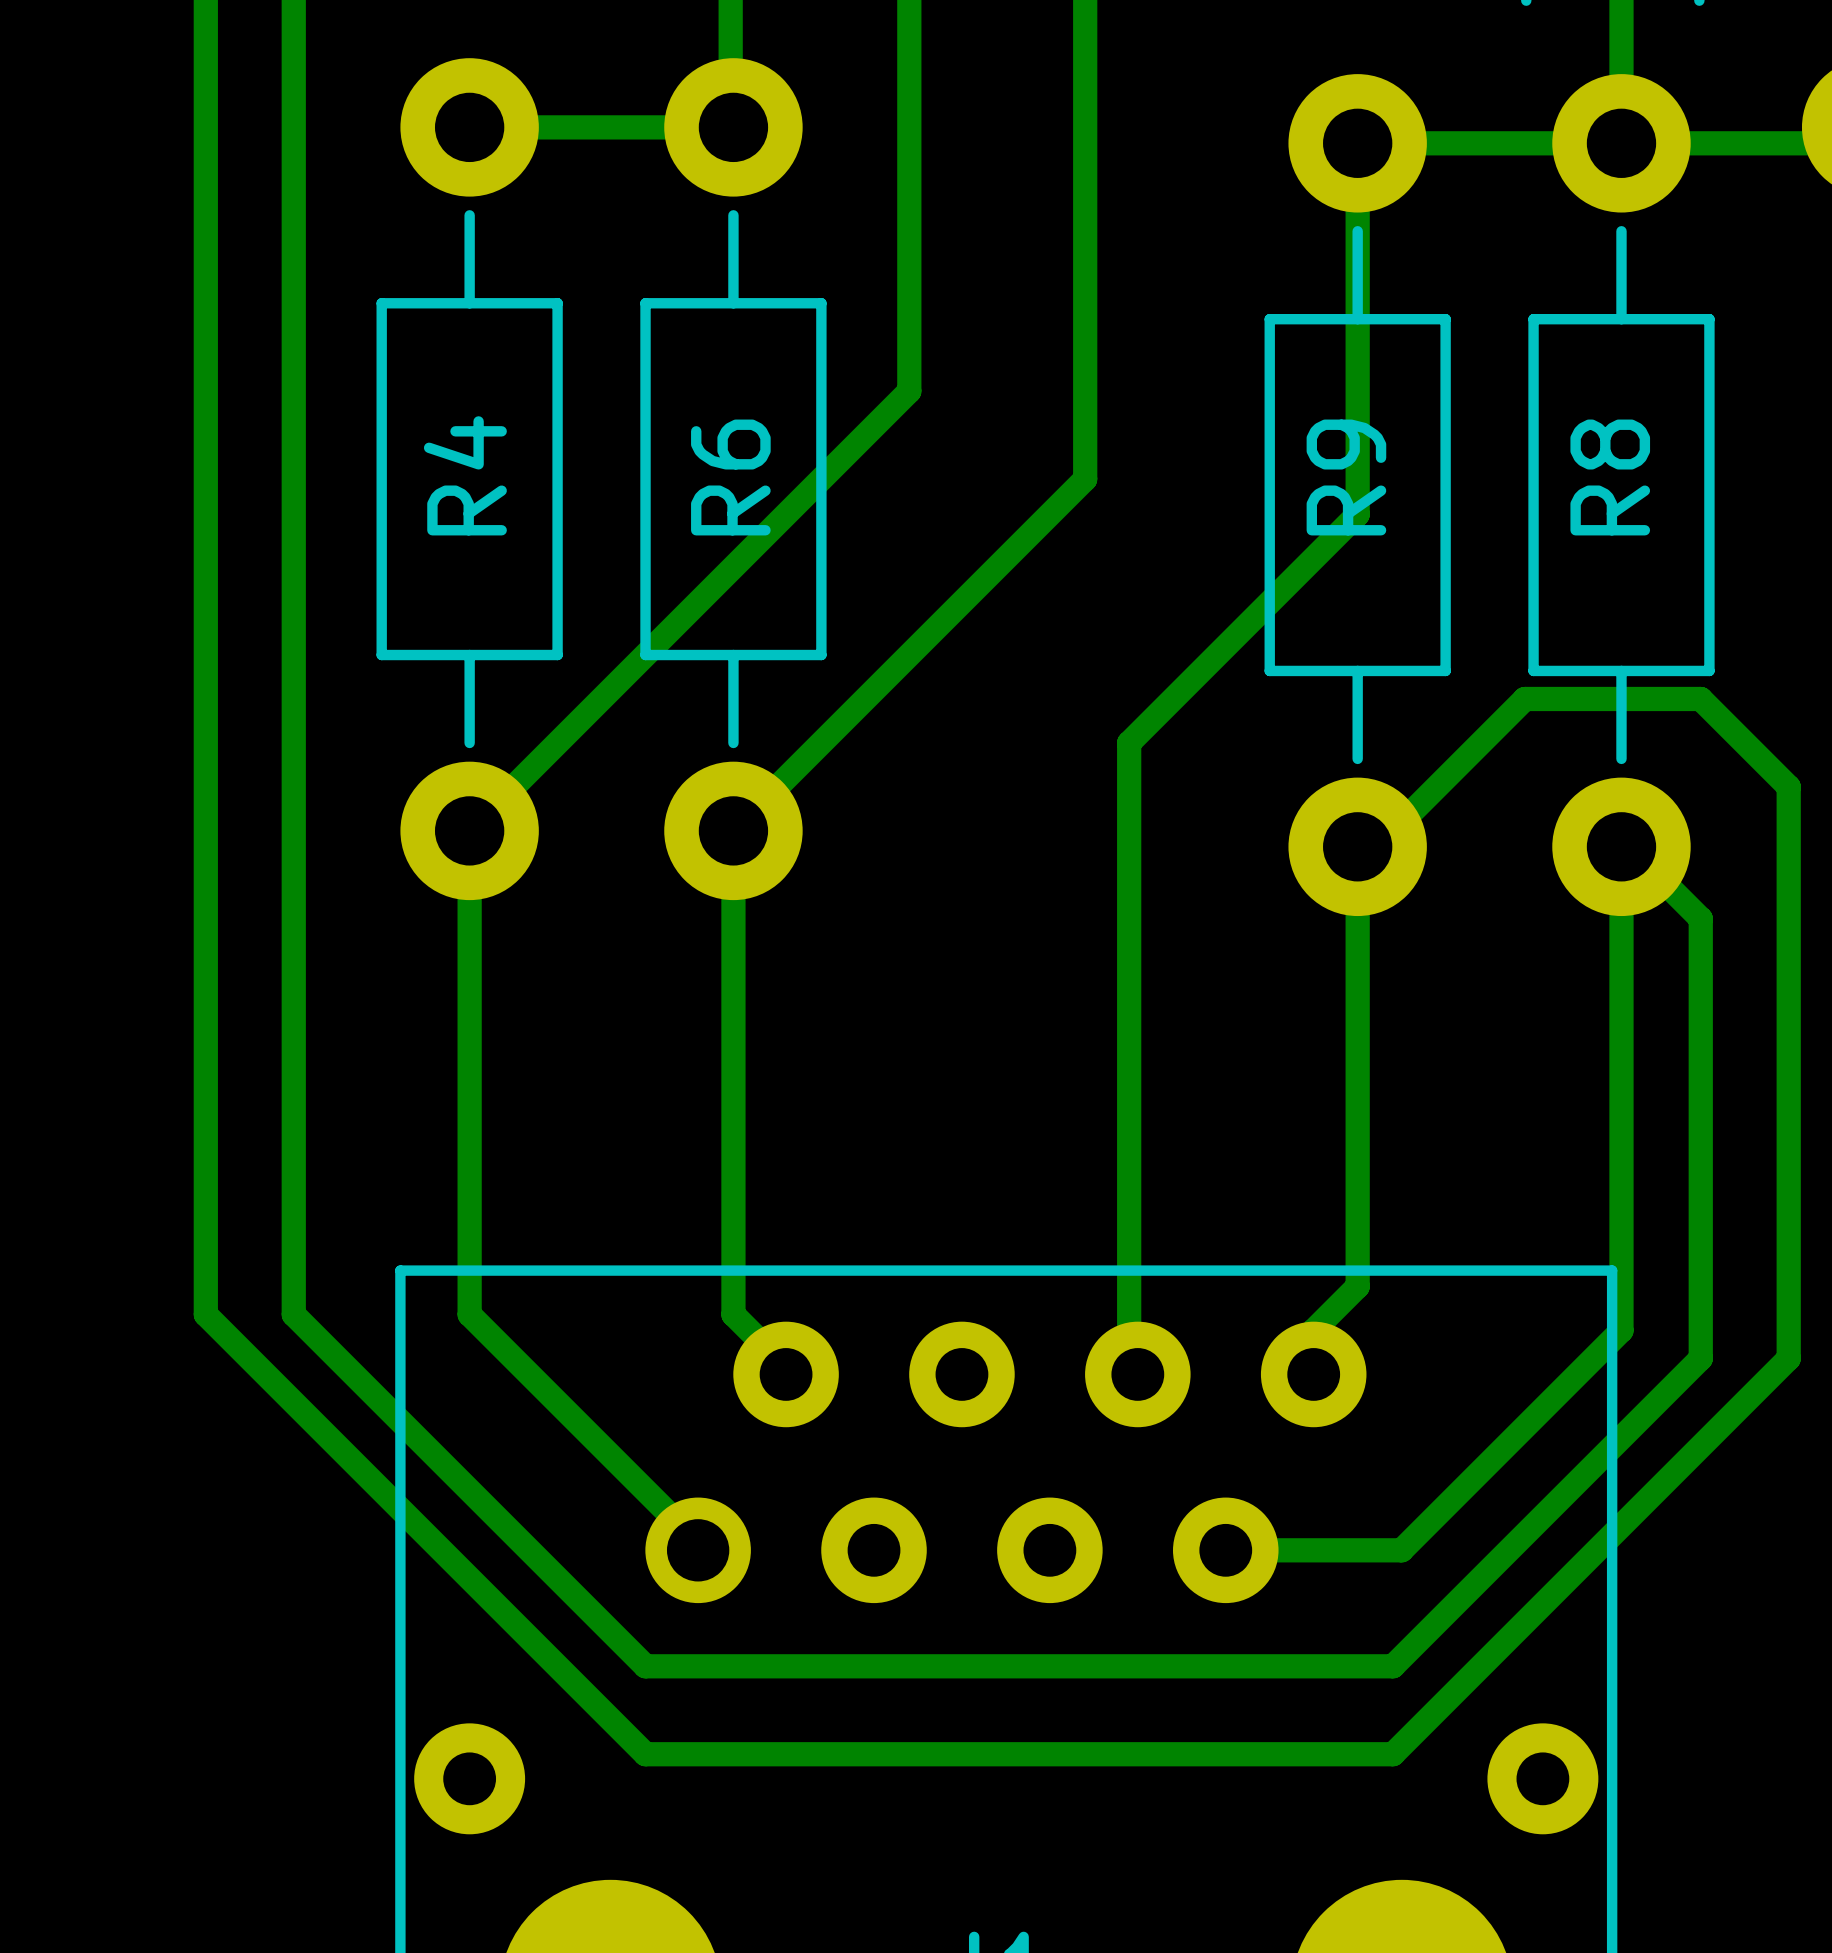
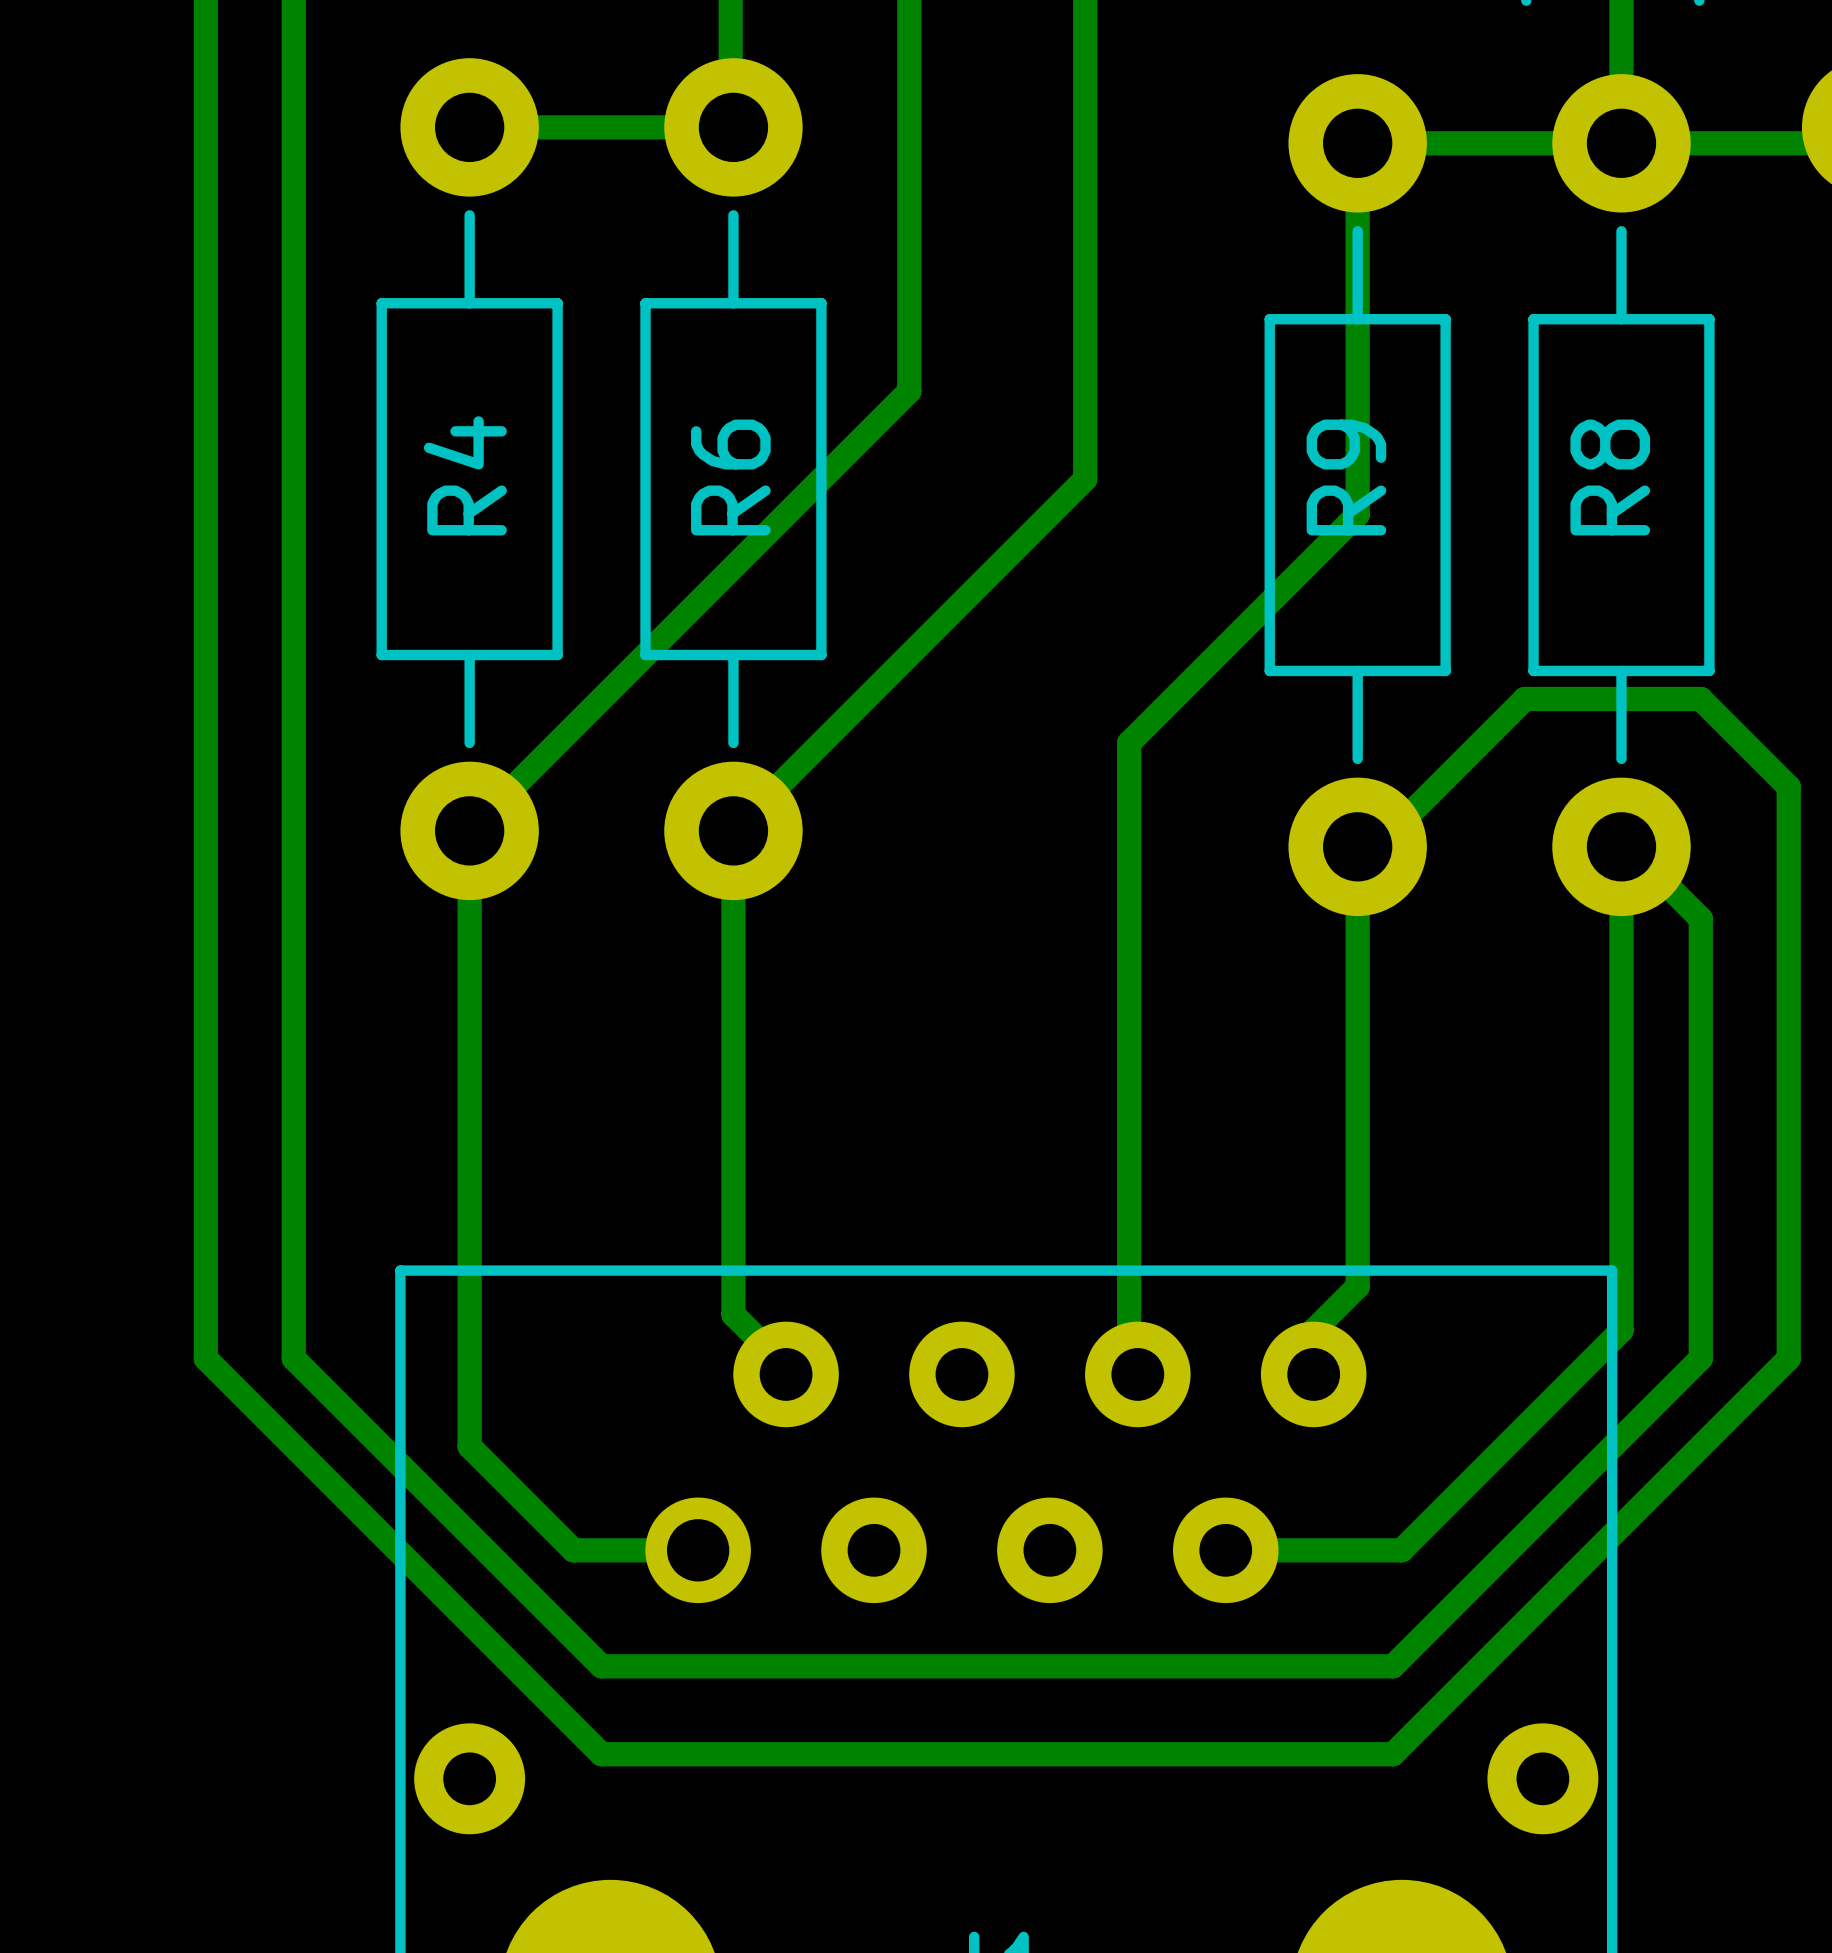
bottom track: (205, 1314) (645, 1754) -> (205, 1314) (205, 1358) (601, 1754) (645, 1754)
bottom track: (293, 1314) (645, 1666) -> (293, 1314) (293, 1358) (601, 1666) (645, 1666)
bottom track: (469, 1314) (705, 1550) (698, 1550) -> (469, 1314) (469, 1446) (573, 1550) (698, 1550)

